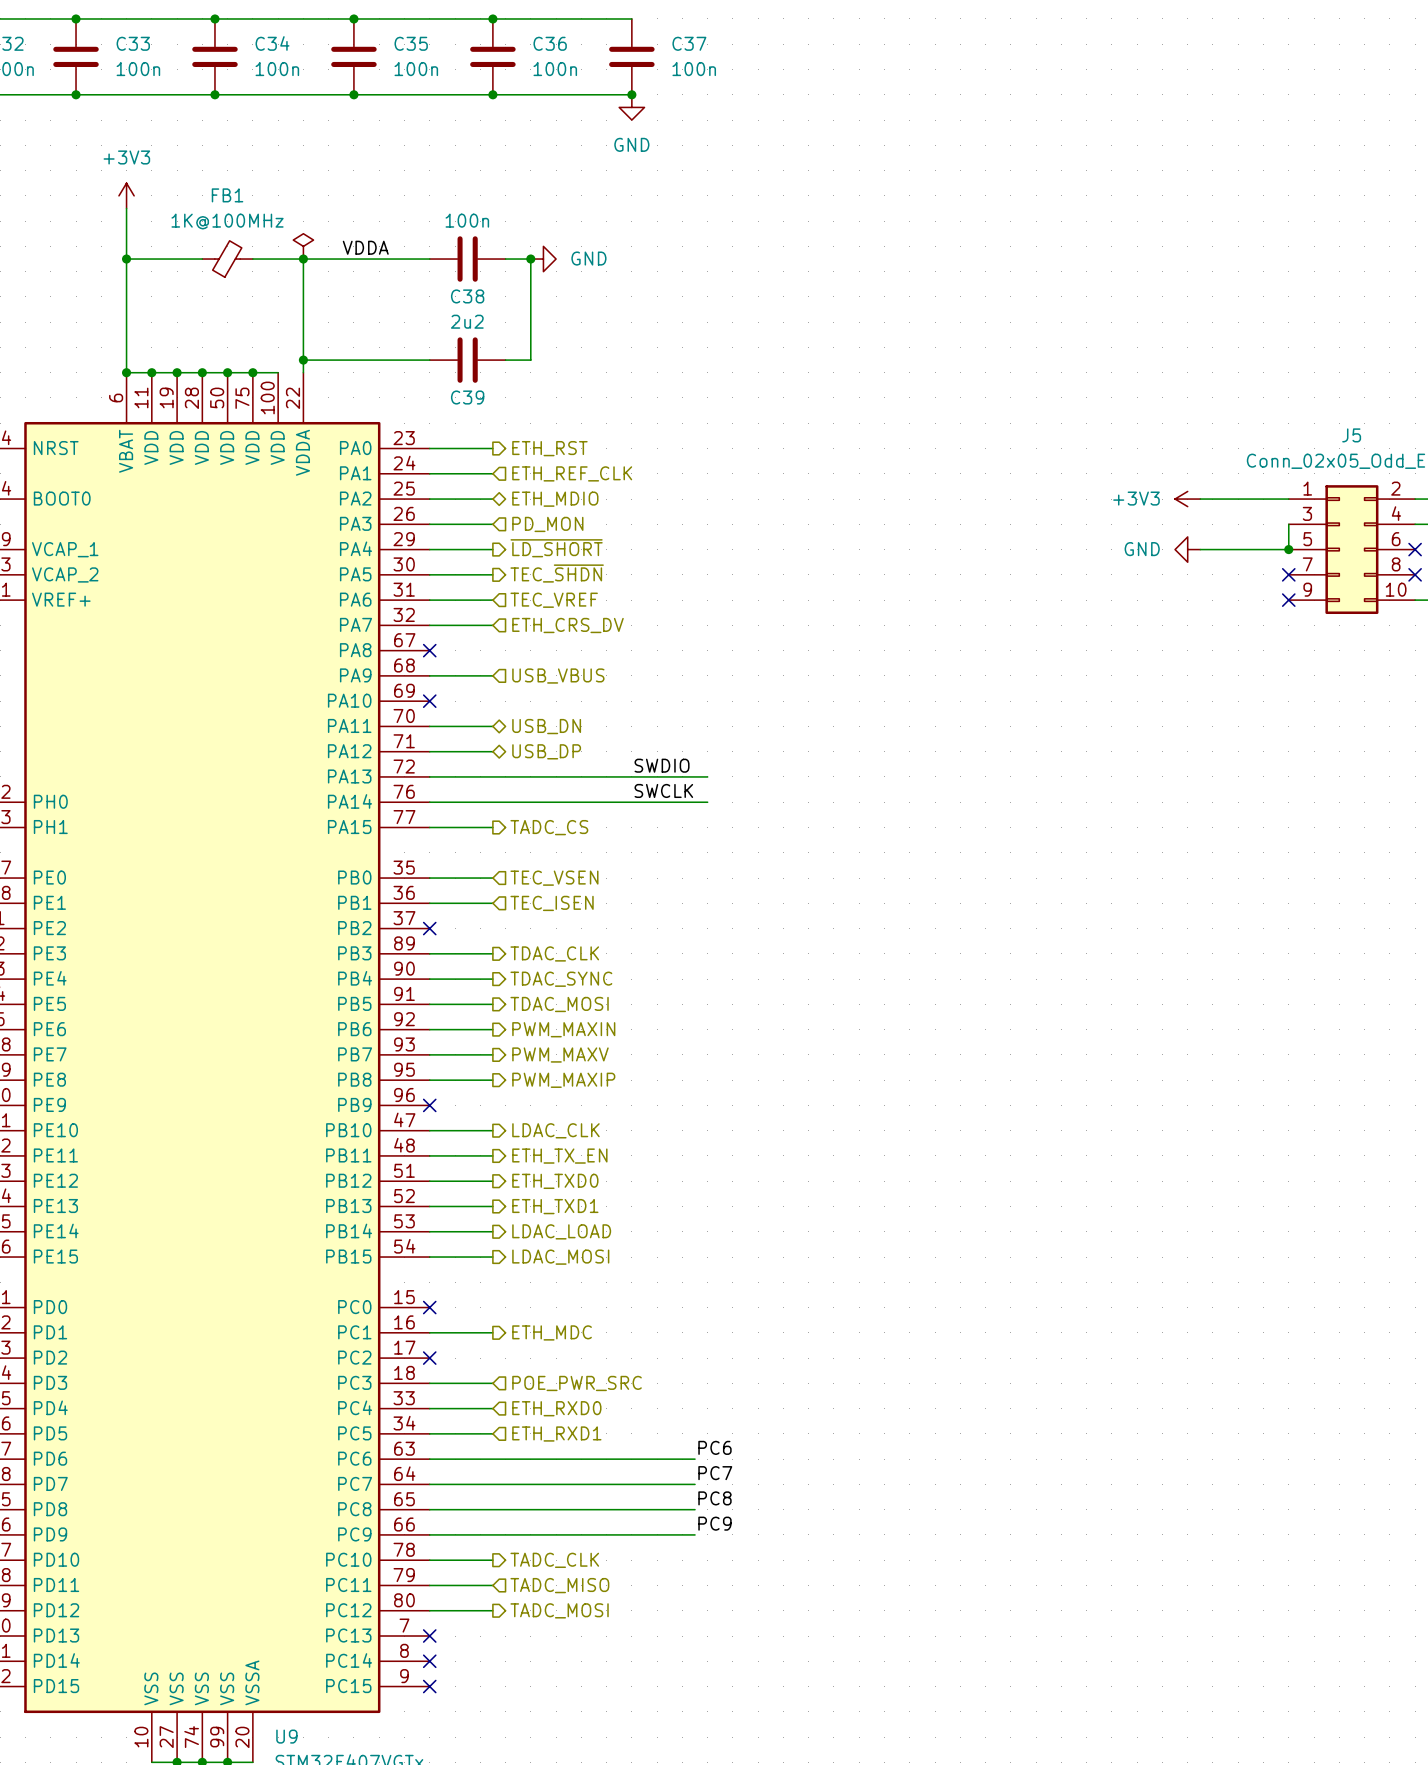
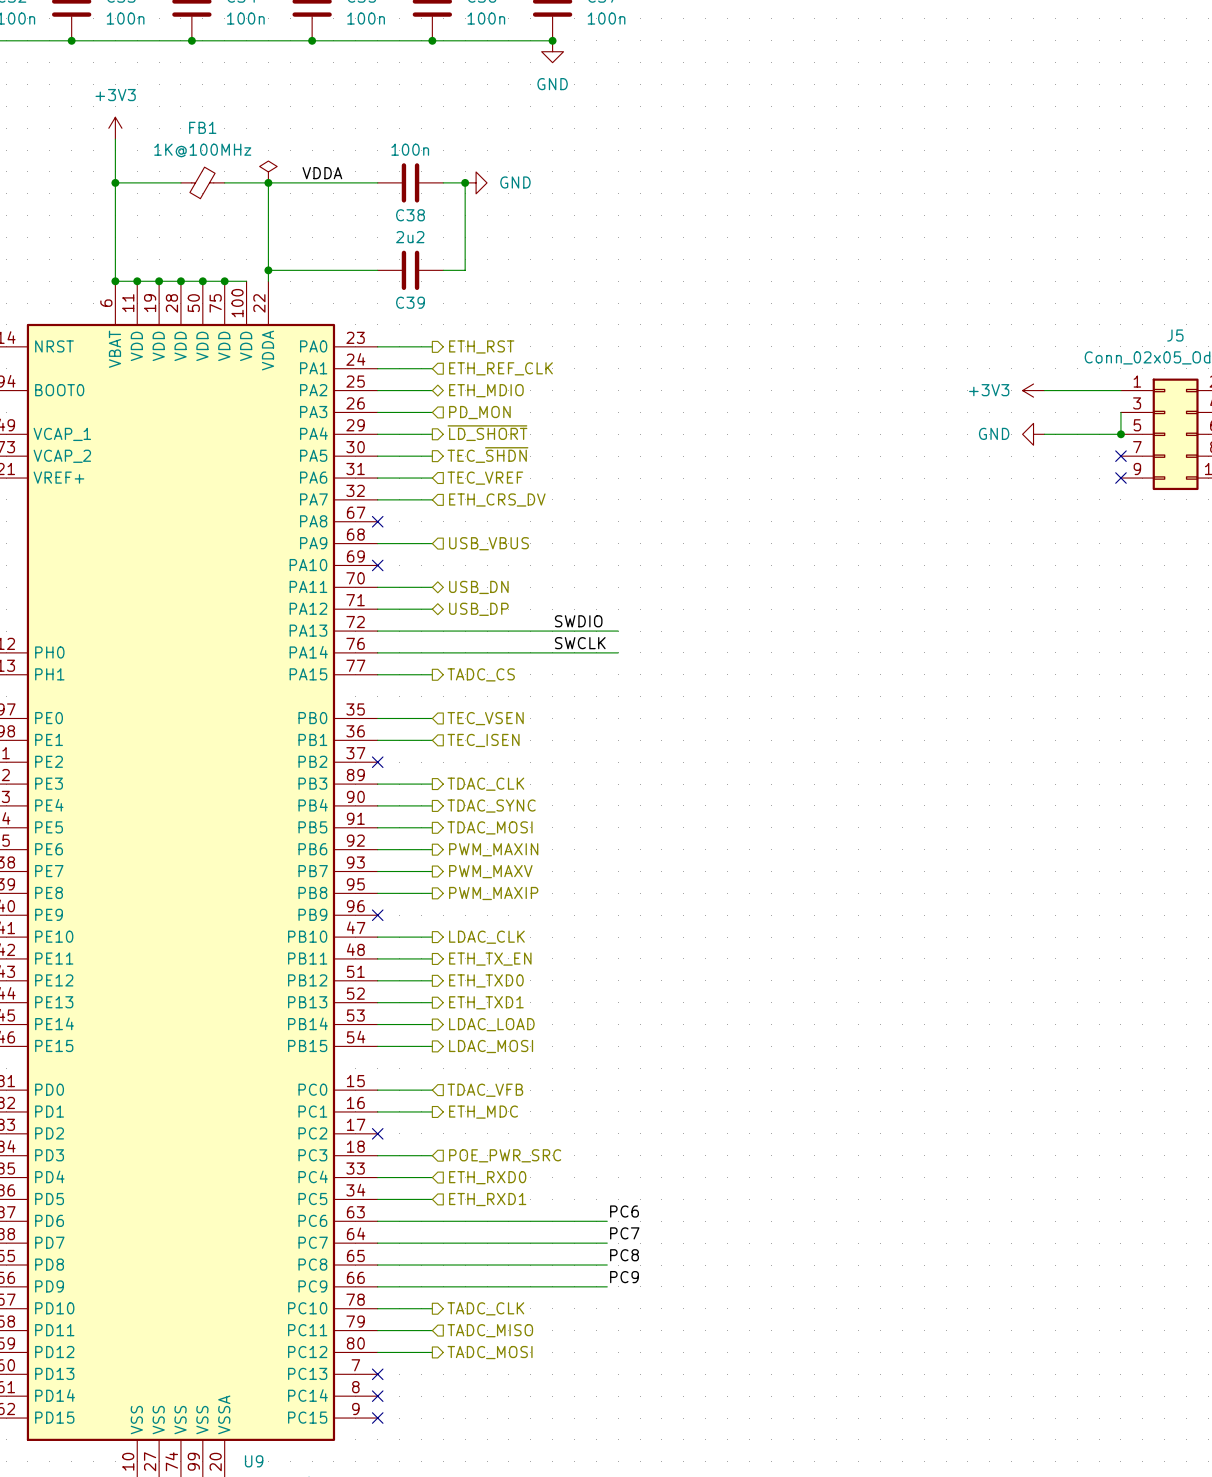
wire: none -> (377, 1090) (432, 1090)
no-connect mark: (429, 1307) -> none
hierarchical label: none -> TDAC_VFB (485, 1090)

